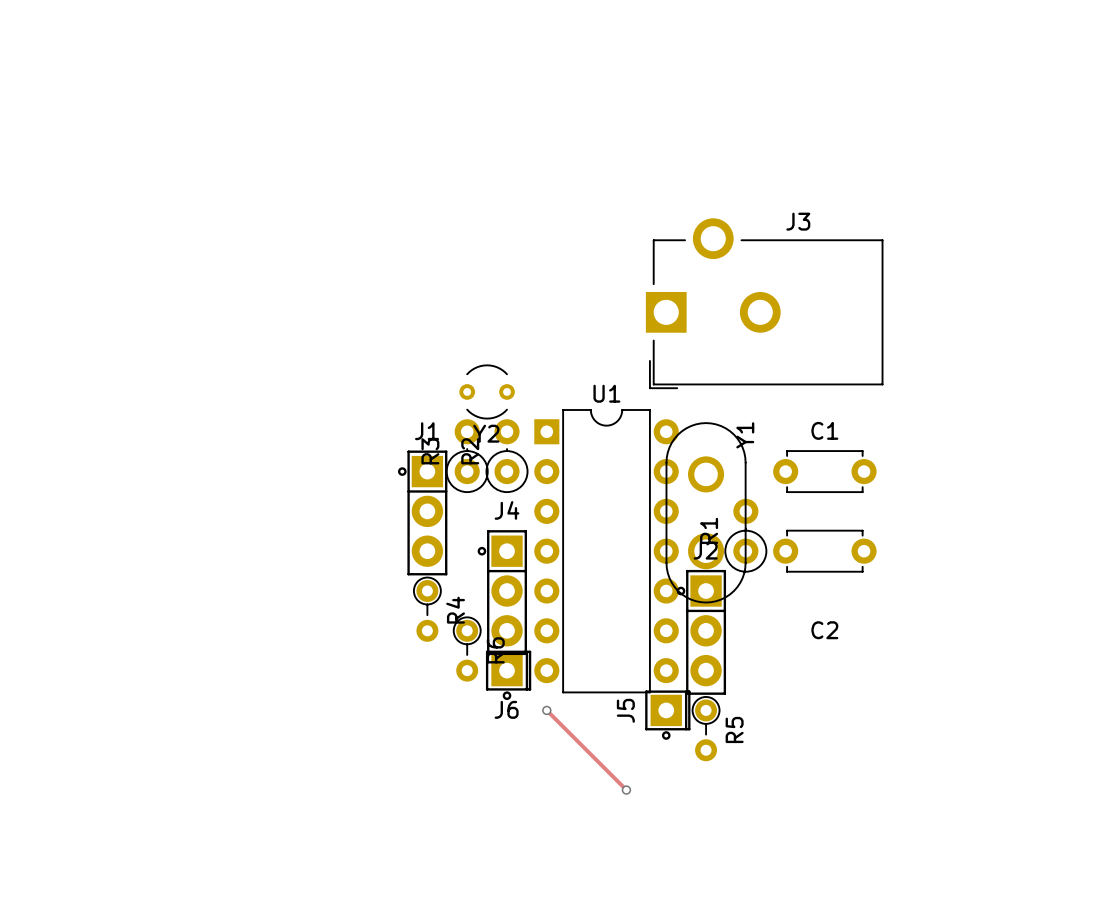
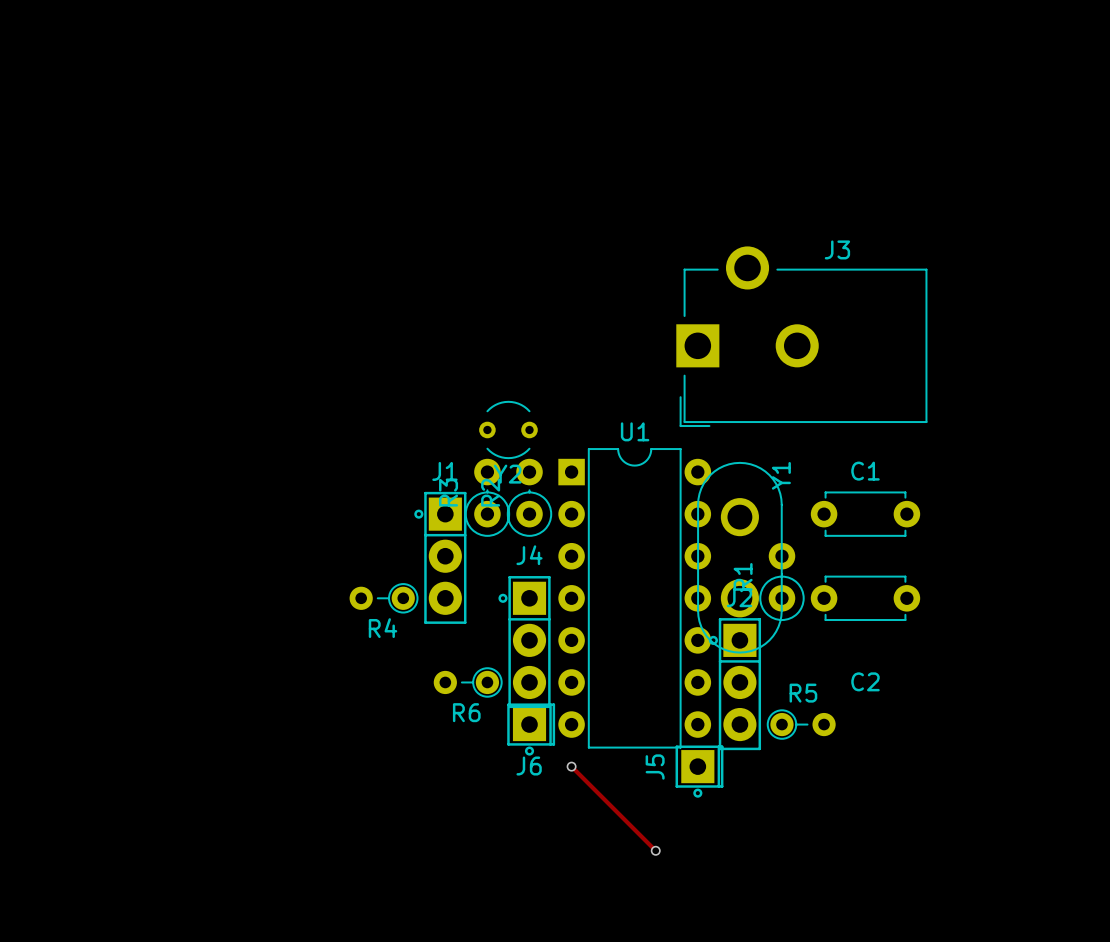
R4 rotation: 0° (427, 609) -> 90° clockwise (384, 598)
R4 position: (427, 609) -> (384, 598)
R6 rotation: 0° (467, 649) -> 90° clockwise (468, 682)
R5 rotation: 0° (706, 728) -> 90° counterclockwise (801, 724)
R5 position: (706, 728) -> (801, 724)

